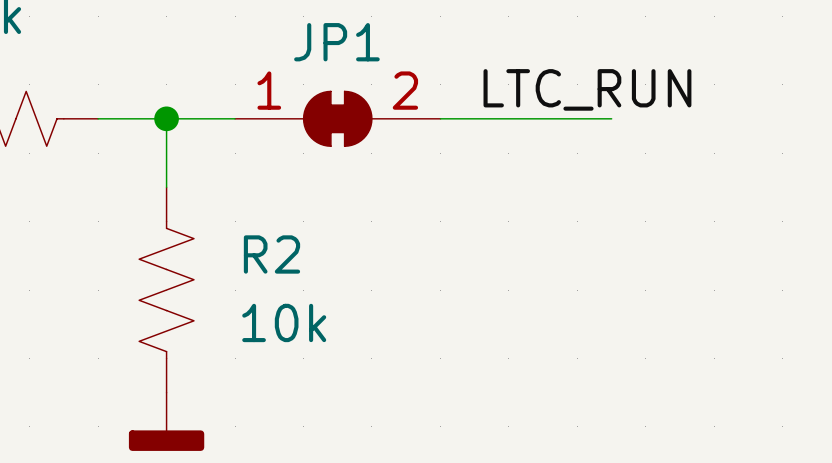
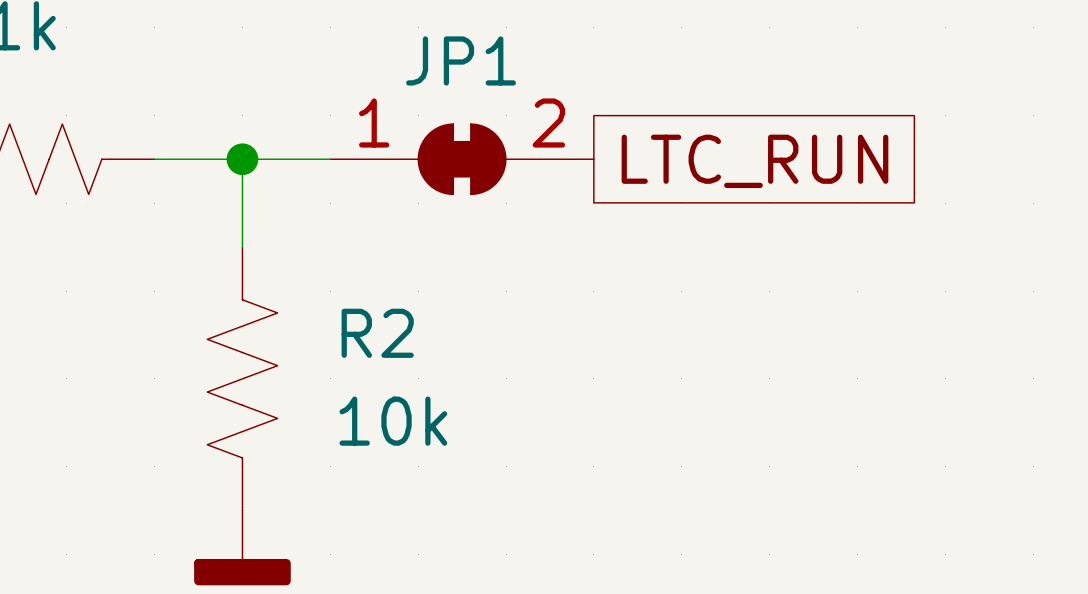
label: LTC_RUN (587, 89) -> none
wire: (440, 118) (611, 118) -> none
global label: none -> LTC_RUN (754, 161)

